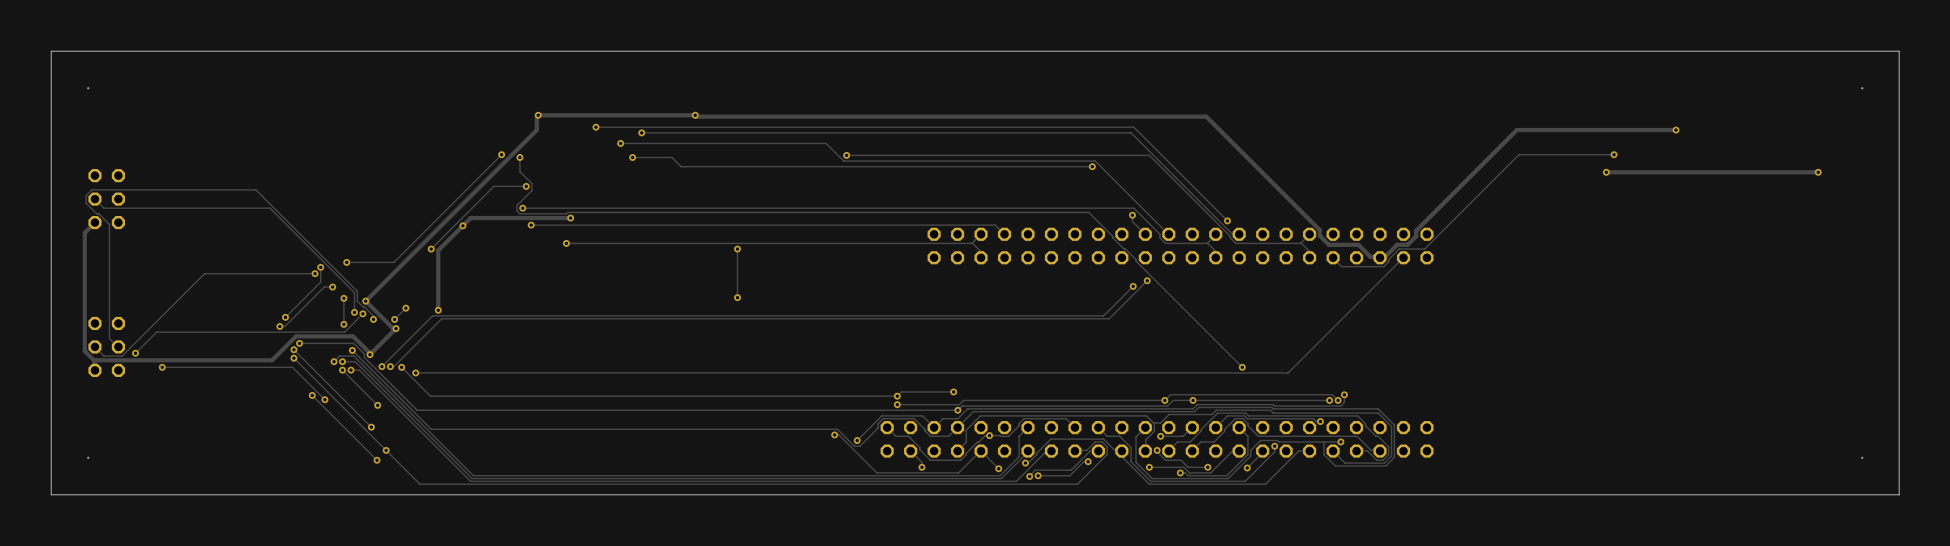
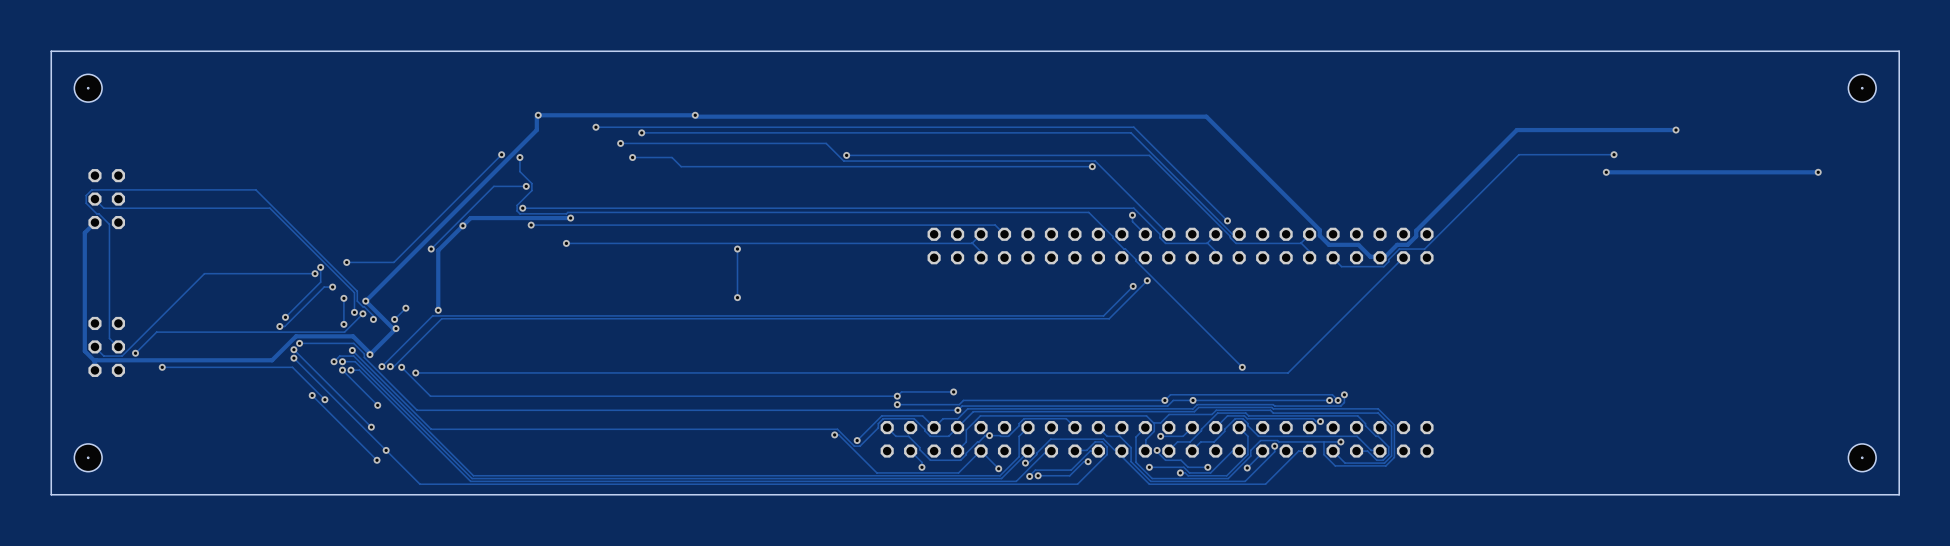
hole: none -> (88, 88)
hole: none -> (1862, 88)
hole: none -> (88, 457)
hole: none -> (1862, 457)

